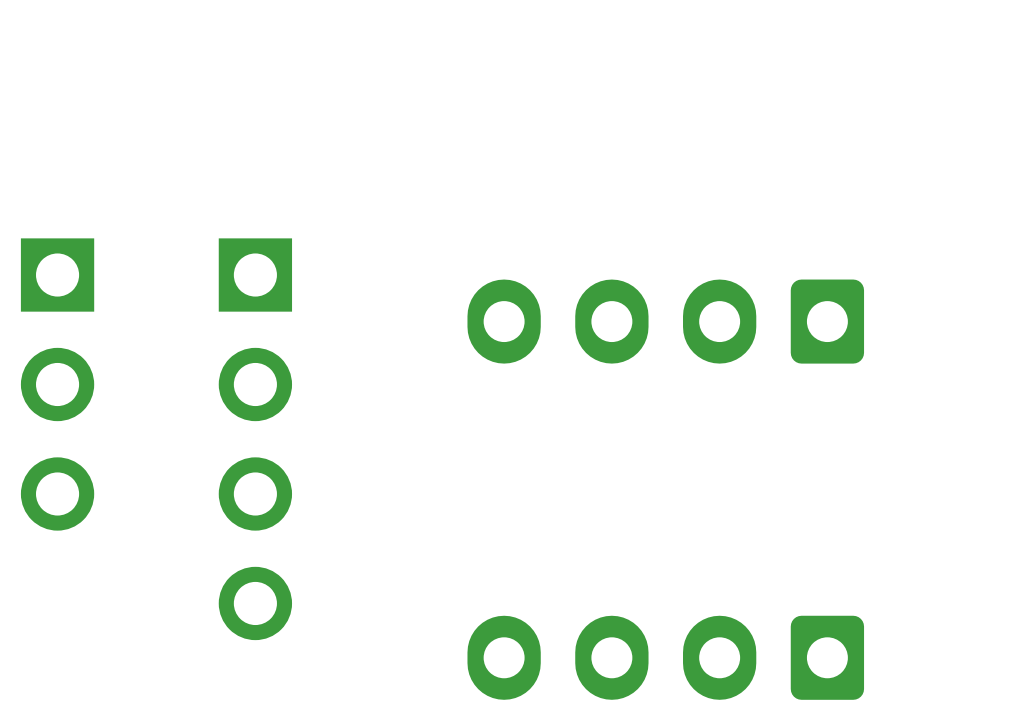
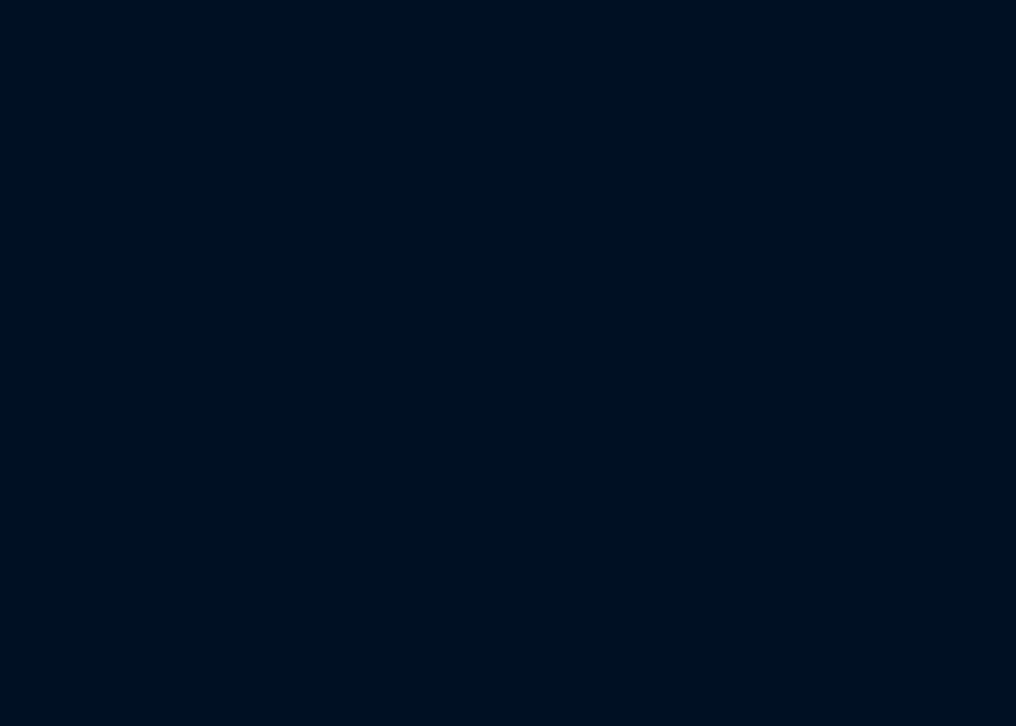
part: (665, 321) -> none
part: (57, 384) -> none
part: (255, 439) -> none
part: (665, 657) -> none

